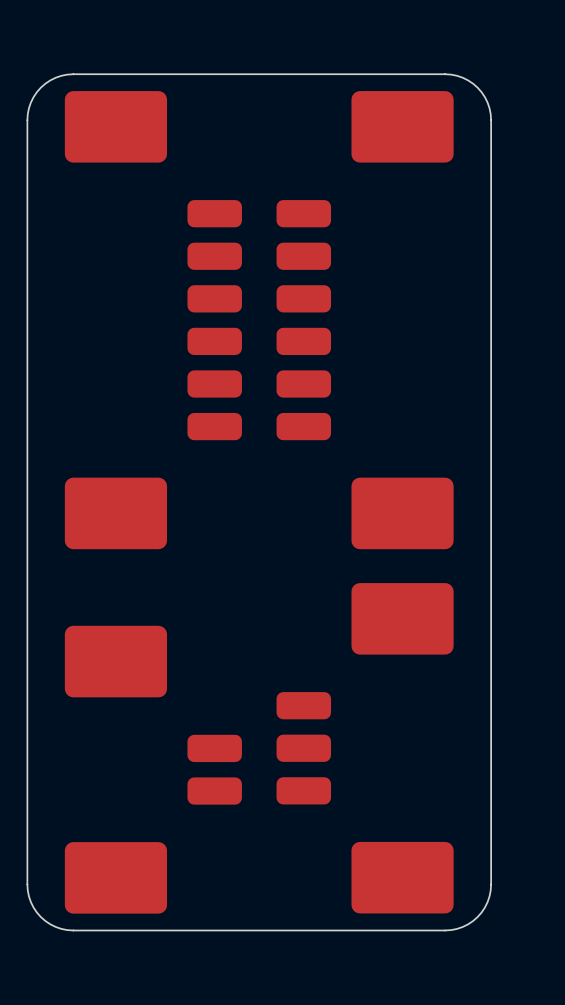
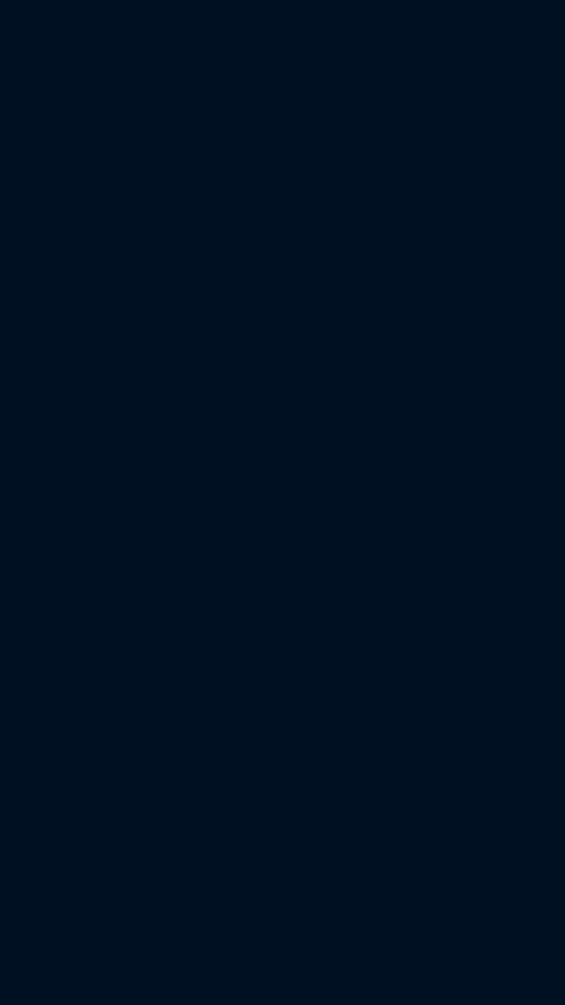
board edge: (445, 74) (67, 74) (55, 77) (45, 83) (36, 92) (30, 102) (27, 120) (27, 884) (28, 896) (33, 907) (45, 920) (55, 926) (73, 930) (445, 930) (457, 928) (473, 920) (481, 912) (487, 902) (491, 884) (491, 120) (487, 102) (477, 87) (462, 77) (445, 74) -> none
part: (153, 320) -> none
part: (365, 320) -> none
part: (365, 748) -> none
part: (153, 769) -> none

